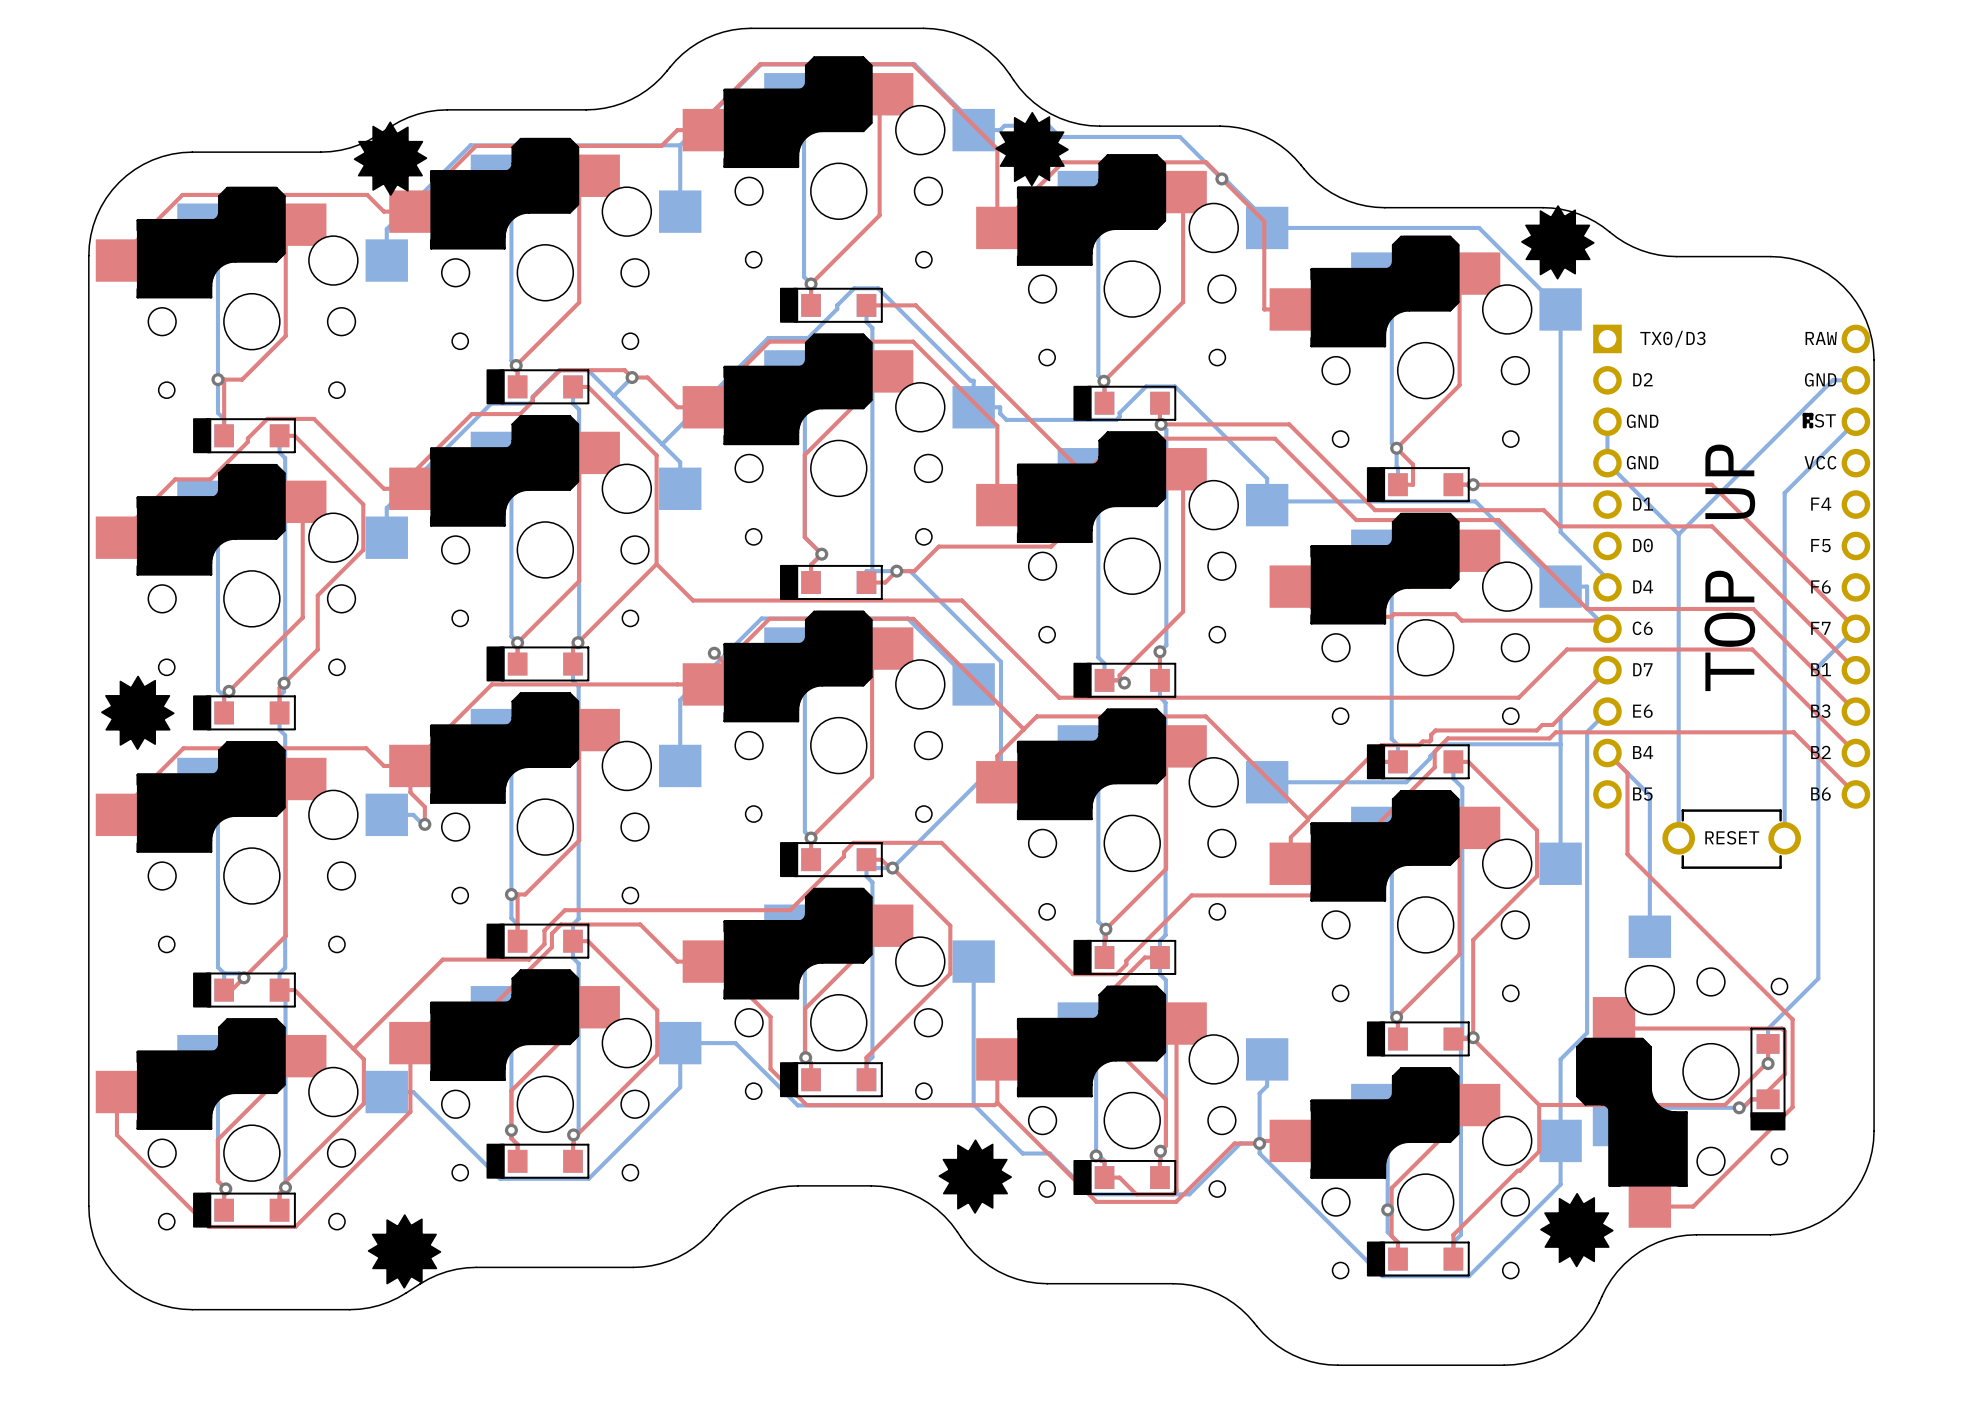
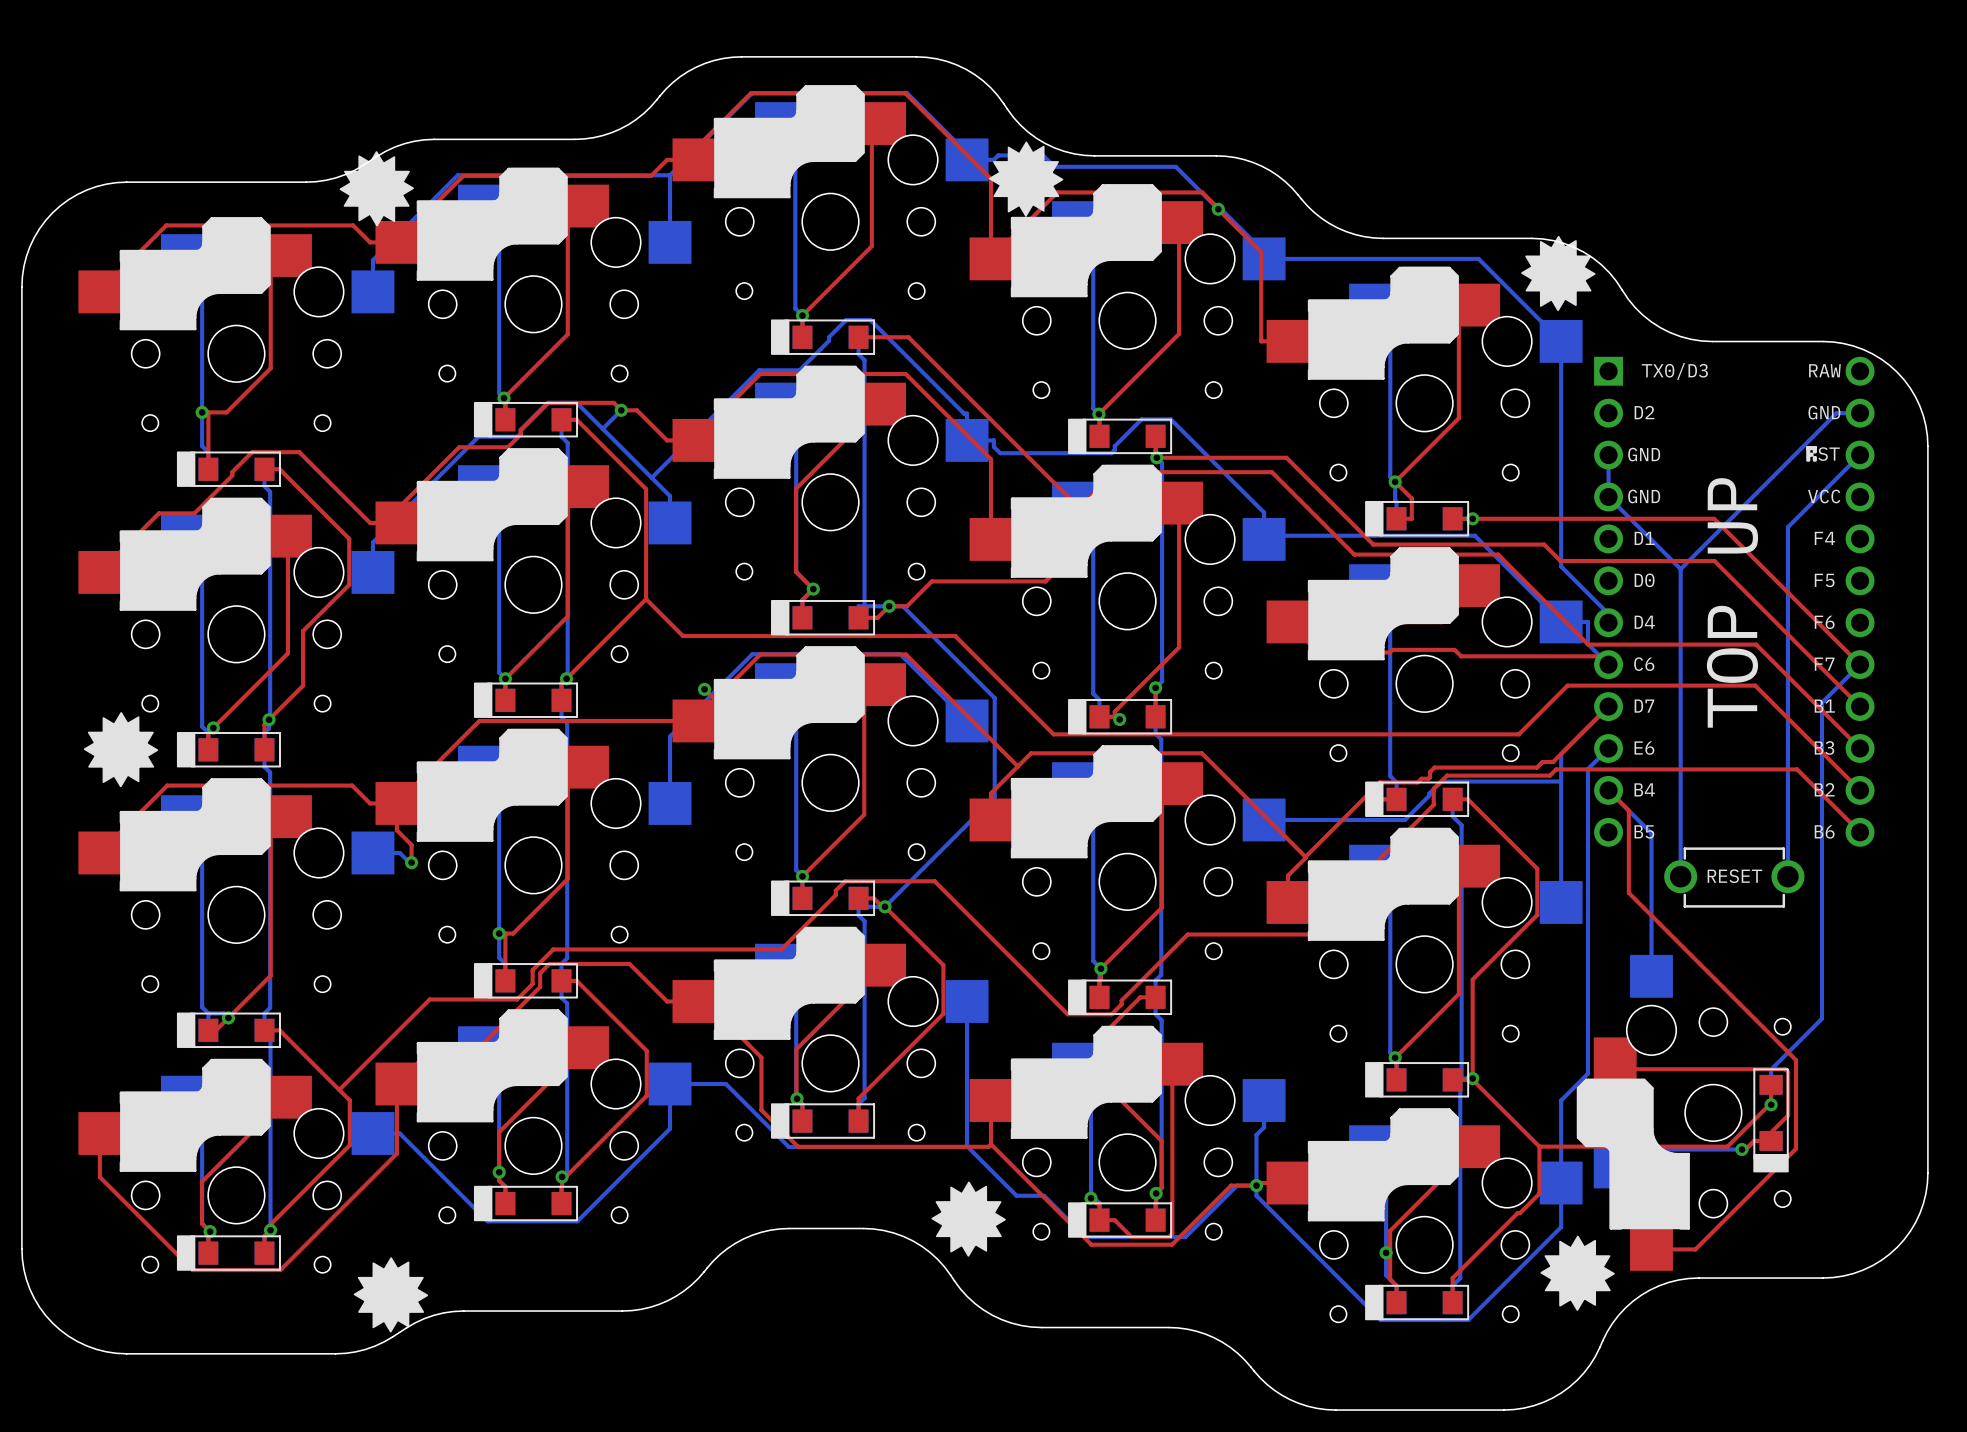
board edge: (192, 152) (172, 154) (152, 160) (134, 169) (119, 182) (106, 198) (96, 216) (90, 235) (88, 255) (89, 1216) (93, 1236) (101, 1254) (112, 1271) (126, 1286) (152, 1301) (172, 1307) (192, 1309) -> (176, 182) (106, 184) (86, 190) (68, 199) (45, 220) (34, 237) (26, 256) (21, 286) (22, 1259) (29, 1289) (39, 1307) (52, 1323) (68, 1336) (86, 1345) (106, 1351) (176, 1353)
board edge: (1531, 207) (1561, 209) (1578, 213) (1595, 221) (1632, 246) (1658, 255) (1780, 257) (1810, 264) (1836, 280) (1850, 294) (1861, 311) (1872, 339) (1874, 360) (1873, 1141) (1869, 1161) (1861, 1180) (1850, 1196) (1836, 1211) (1819, 1222) (1800, 1230) (1770, 1234) -> (1531, 238) (1563, 243) (1592, 258) (1609, 272) (1628, 299) (1642, 315) (1660, 327) (1680, 336) (1712, 341) (1833, 342) (1853, 346) (1872, 353) (1889, 365) (1904, 379) (1915, 396) (1925, 425) (1927, 446) (1927, 1173) (1925, 1193) (1915, 1222) (1904, 1239) (1889, 1254) (1872, 1265) (1853, 1273) (1833, 1277) (1773, 1278)

